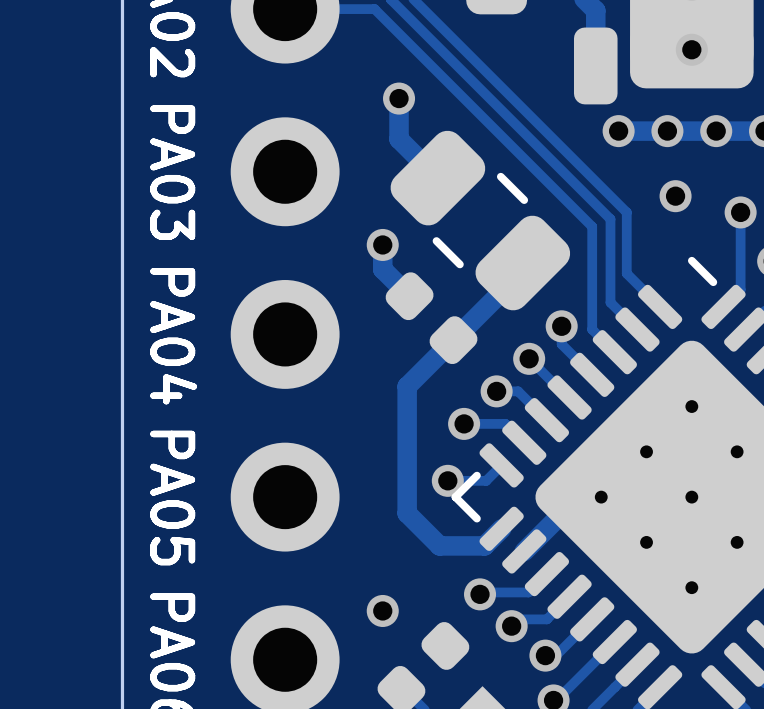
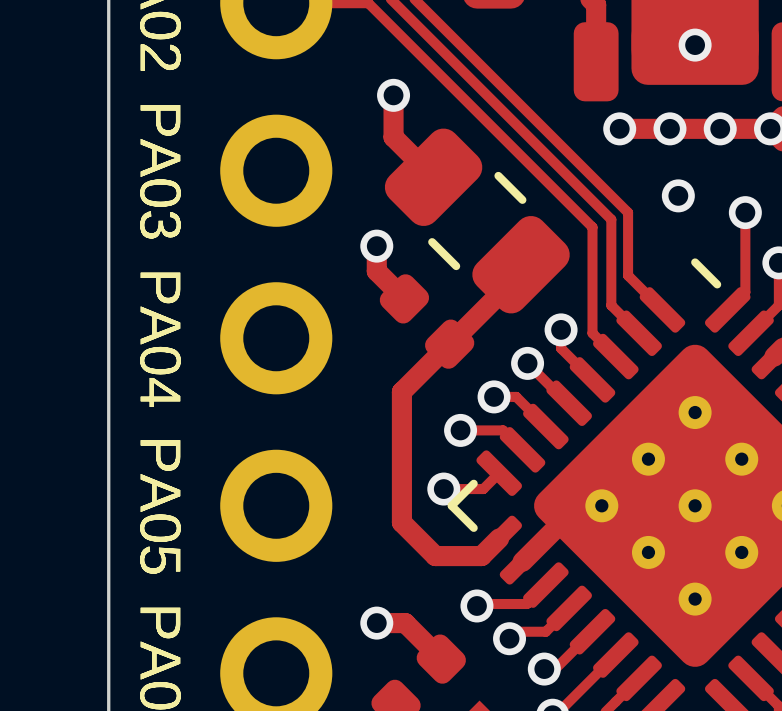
track: none -> (376, 623) (405, 623) (441, 659)

